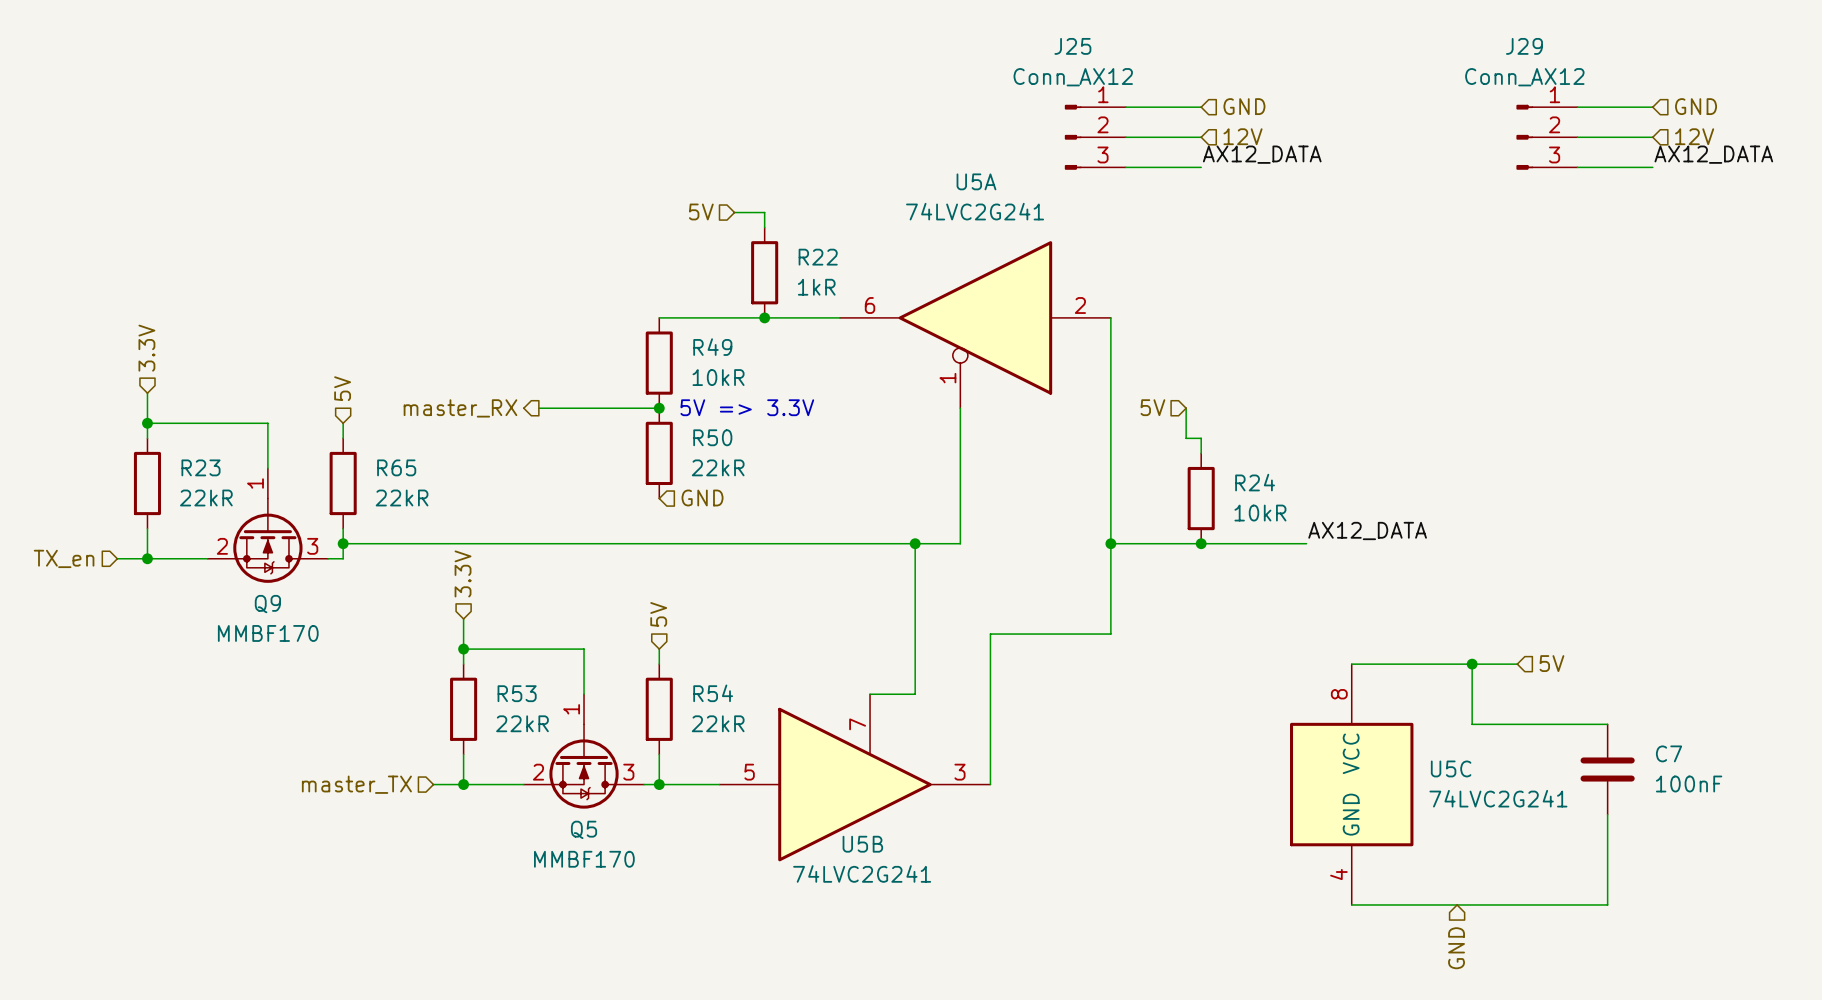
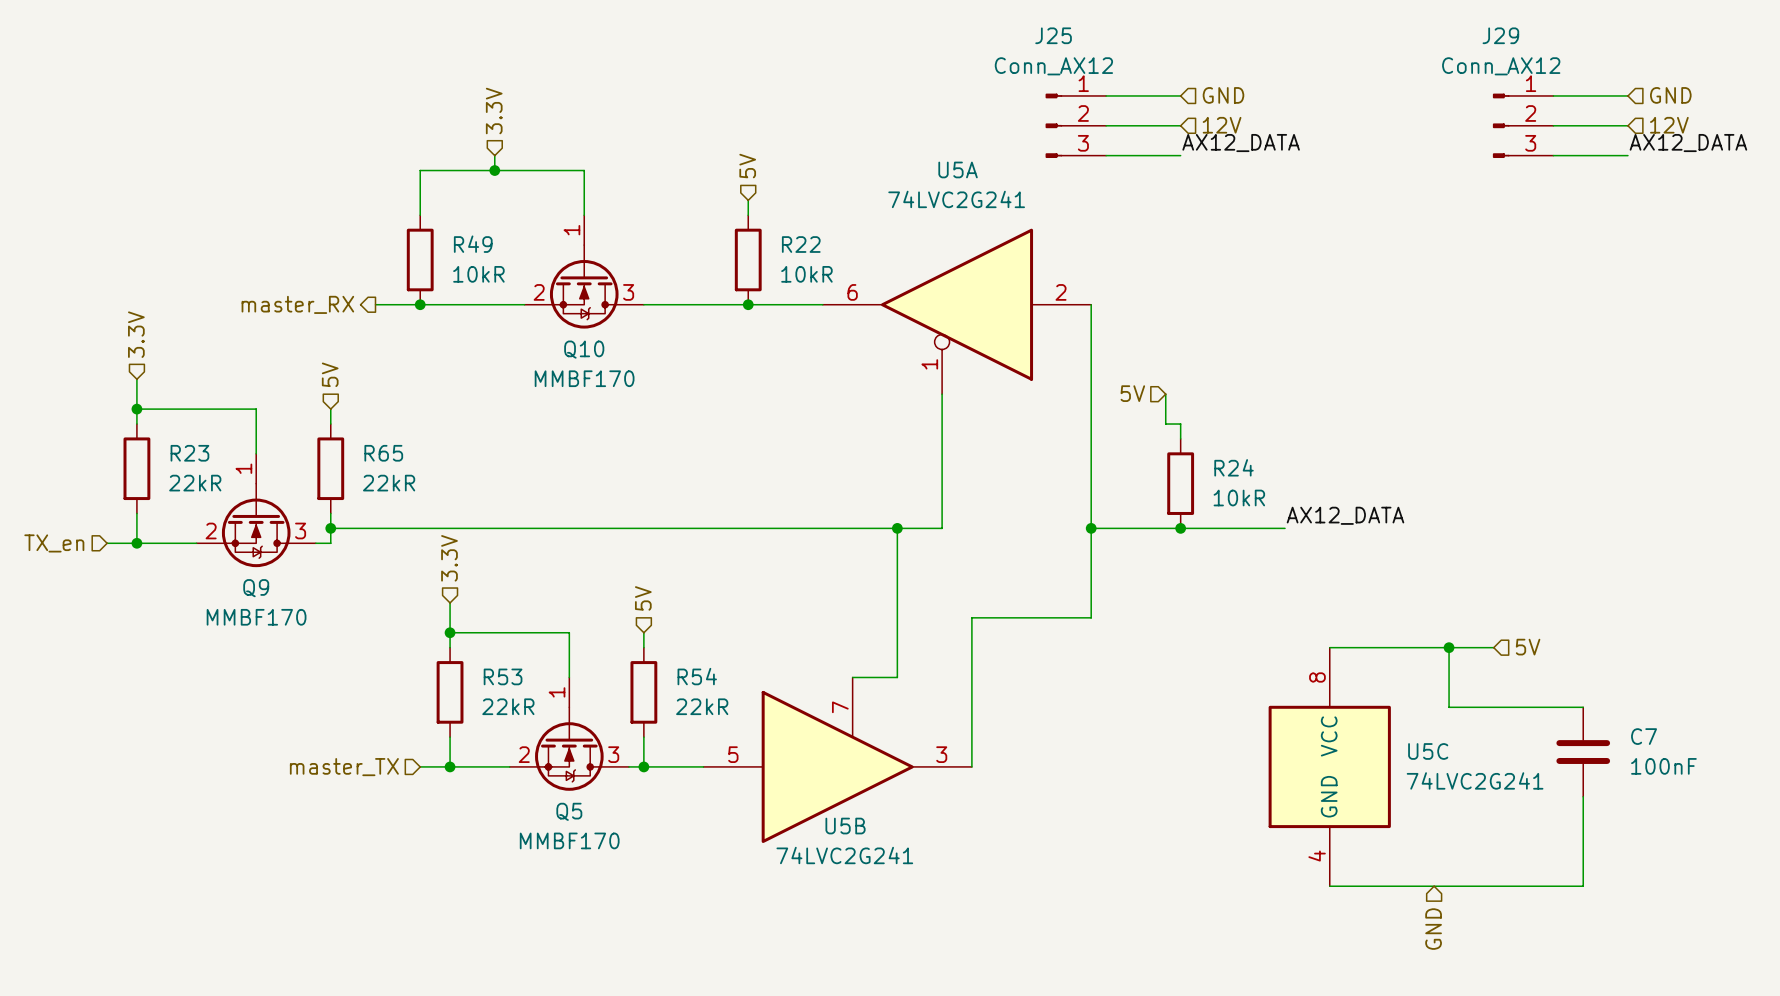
hierarchical label: none -> 3.3V (494, 111)
wire: none -> (494, 155) (494, 170)
junction: none -> (494, 170)
hierarchical label rotation: 0° (701, 211) -> 90° clockwise (747, 166)
hierarchical label position: 5V (701, 211) -> 5V (747, 166)
wire: (734, 212) (764, 212) -> none
wire: none -> (420, 215) (420, 170) (584, 170) (584, 215)
Q10: none -> MMBF170 (584, 271)
R22 value: 1kR (816, 287) -> 10kR (806, 274)
wire: none -> (375, 304) (524, 304)
junction: none -> (420, 304)
R49 position: (659, 363) -> (420, 259)
text: 5V => 3.3V (747, 407) -> none
hierarchical label position: master_RX (460, 408) -> master_RX (297, 304)
wire: (538, 408) (659, 408) -> none
junction: (659, 408) -> none
R50: 22kR (659, 453) -> none
hierarchical label: GND (702, 497) -> none

